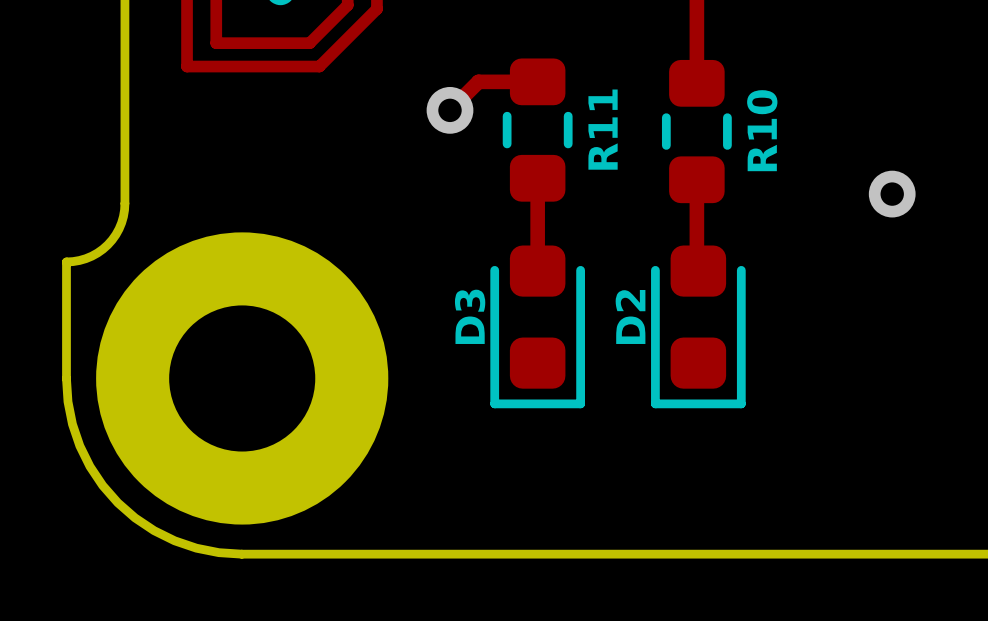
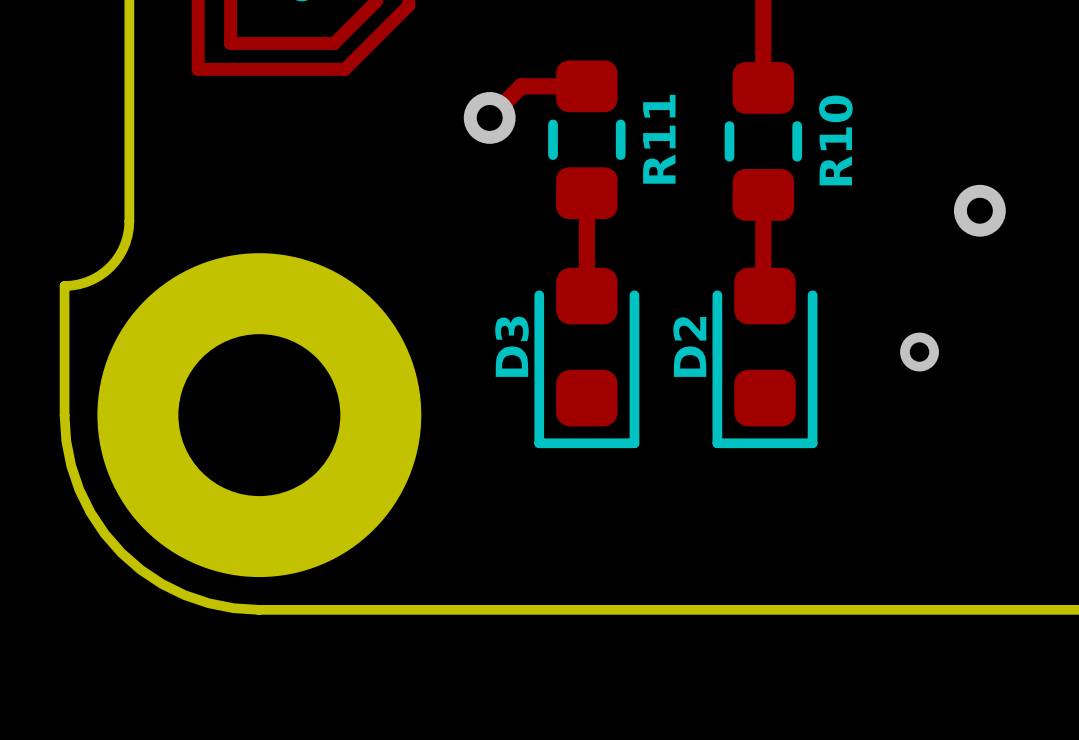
via: none -> (919, 352)

